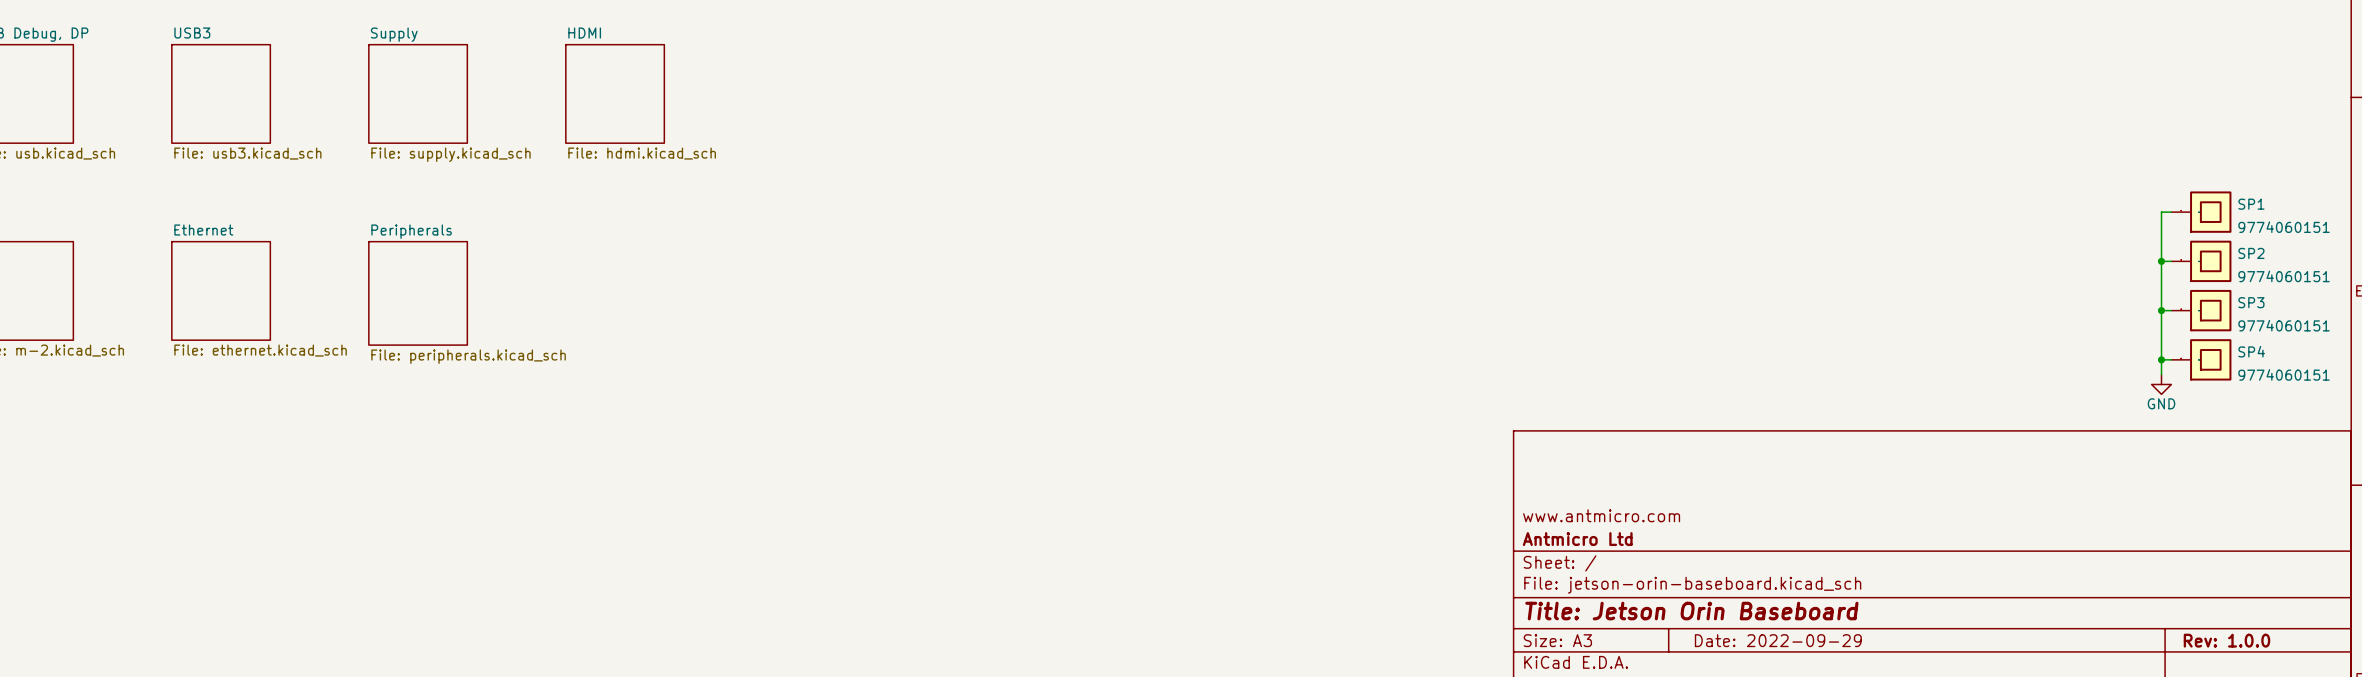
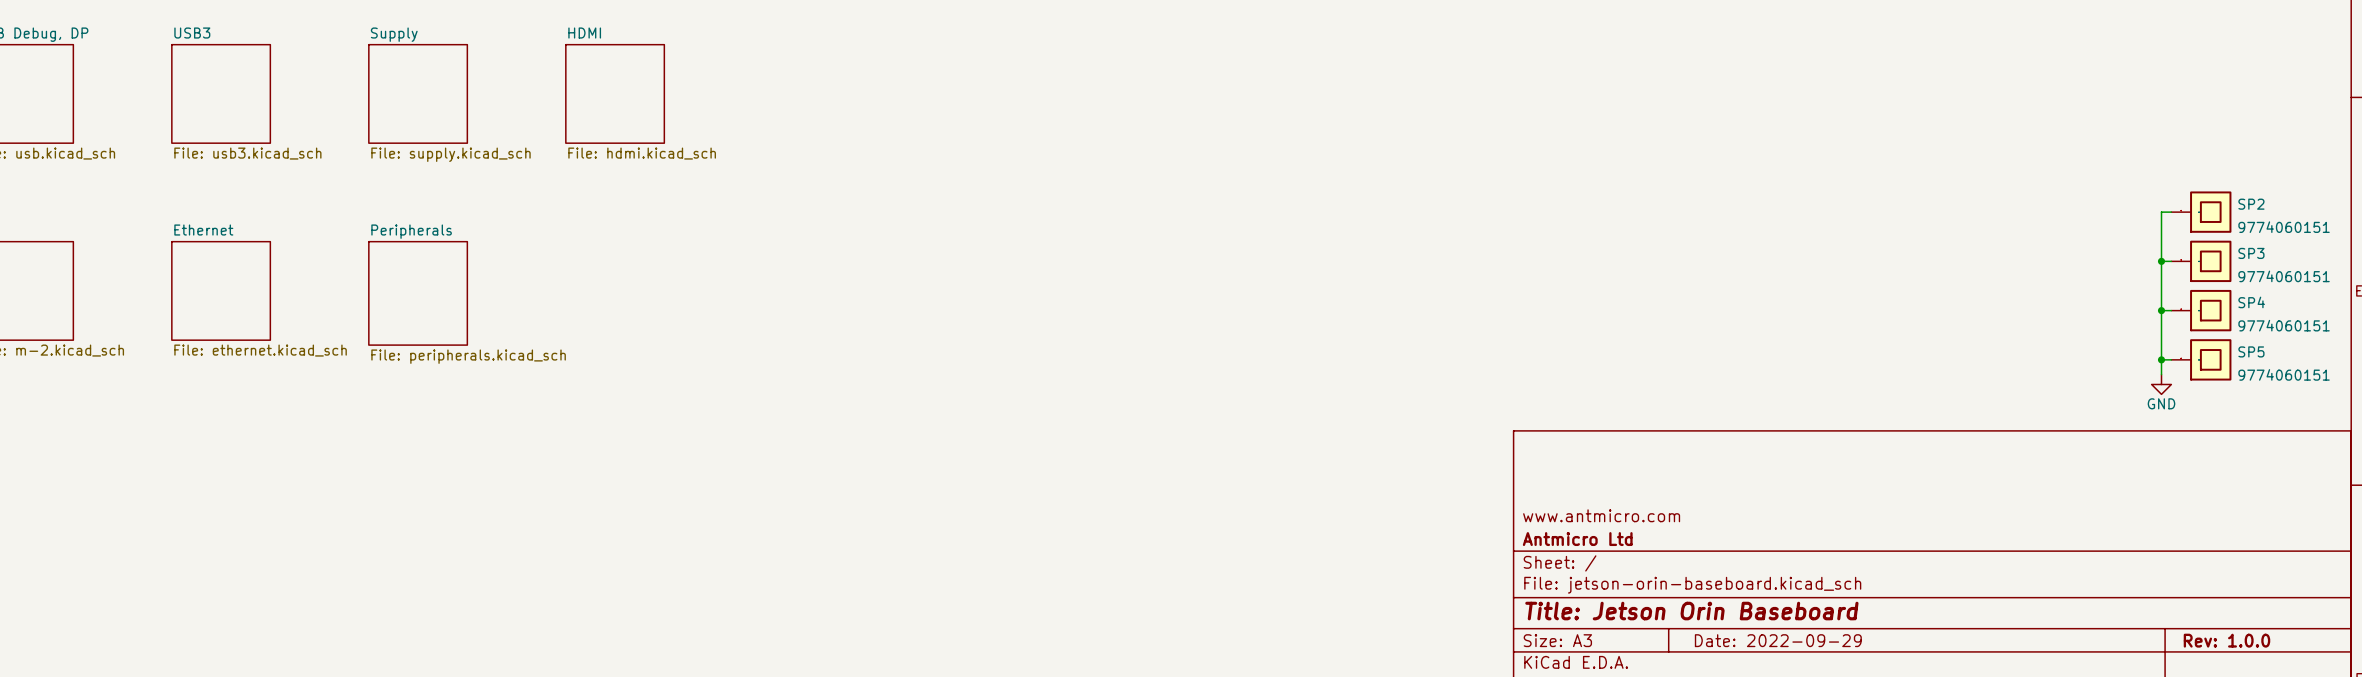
SP1 name: SP1 (2251, 204) -> SP2 (2251, 204)
SP2 name: SP2 (2251, 253) -> SP3 (2251, 253)
SP3 name: SP3 (2251, 302) -> SP4 (2251, 302)
SP4 name: SP4 (2251, 351) -> SP5 (2251, 351)

